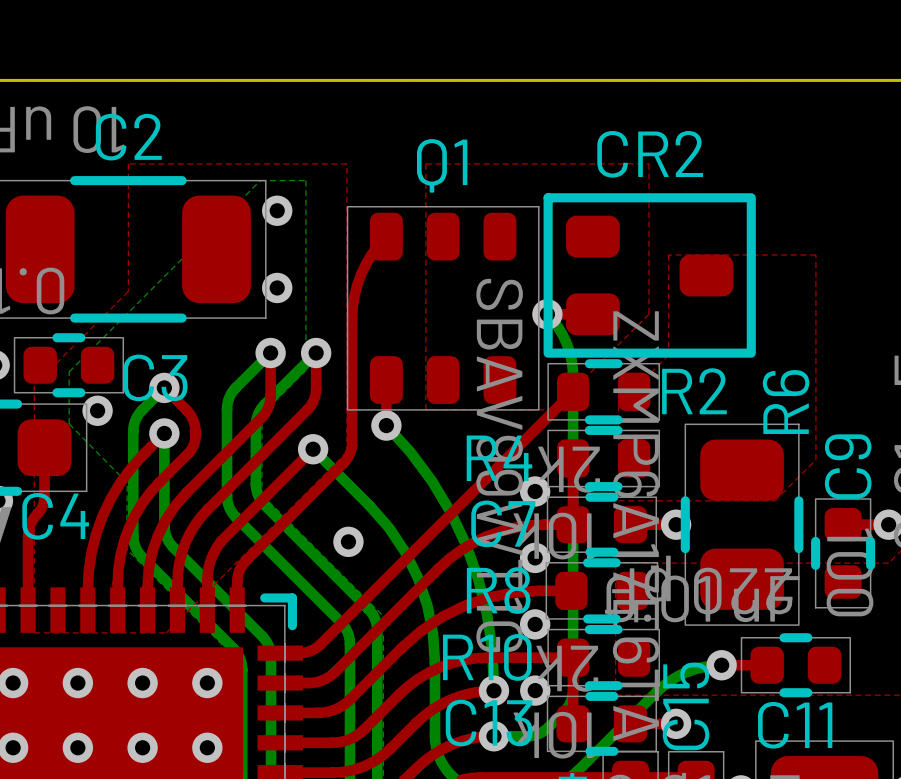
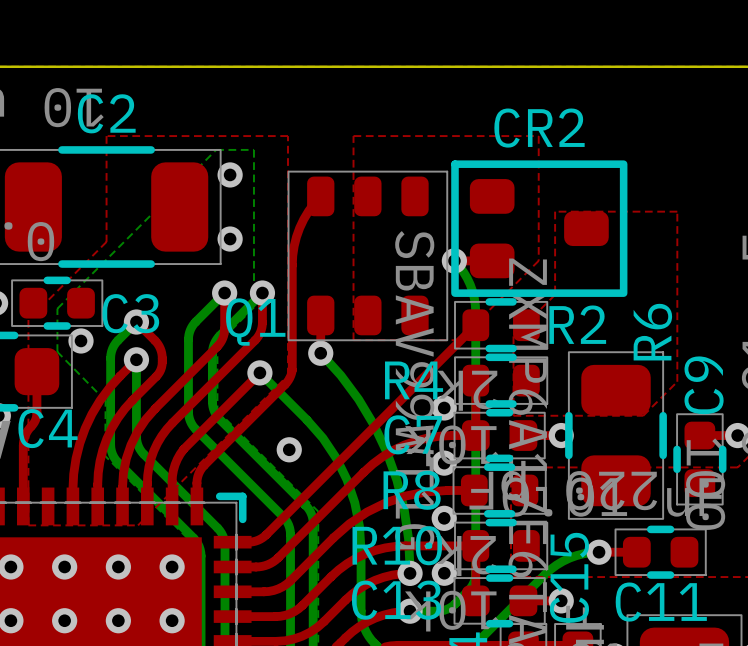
Q1 name position: Q1 (442, 165) -> Q1 (255, 322)

